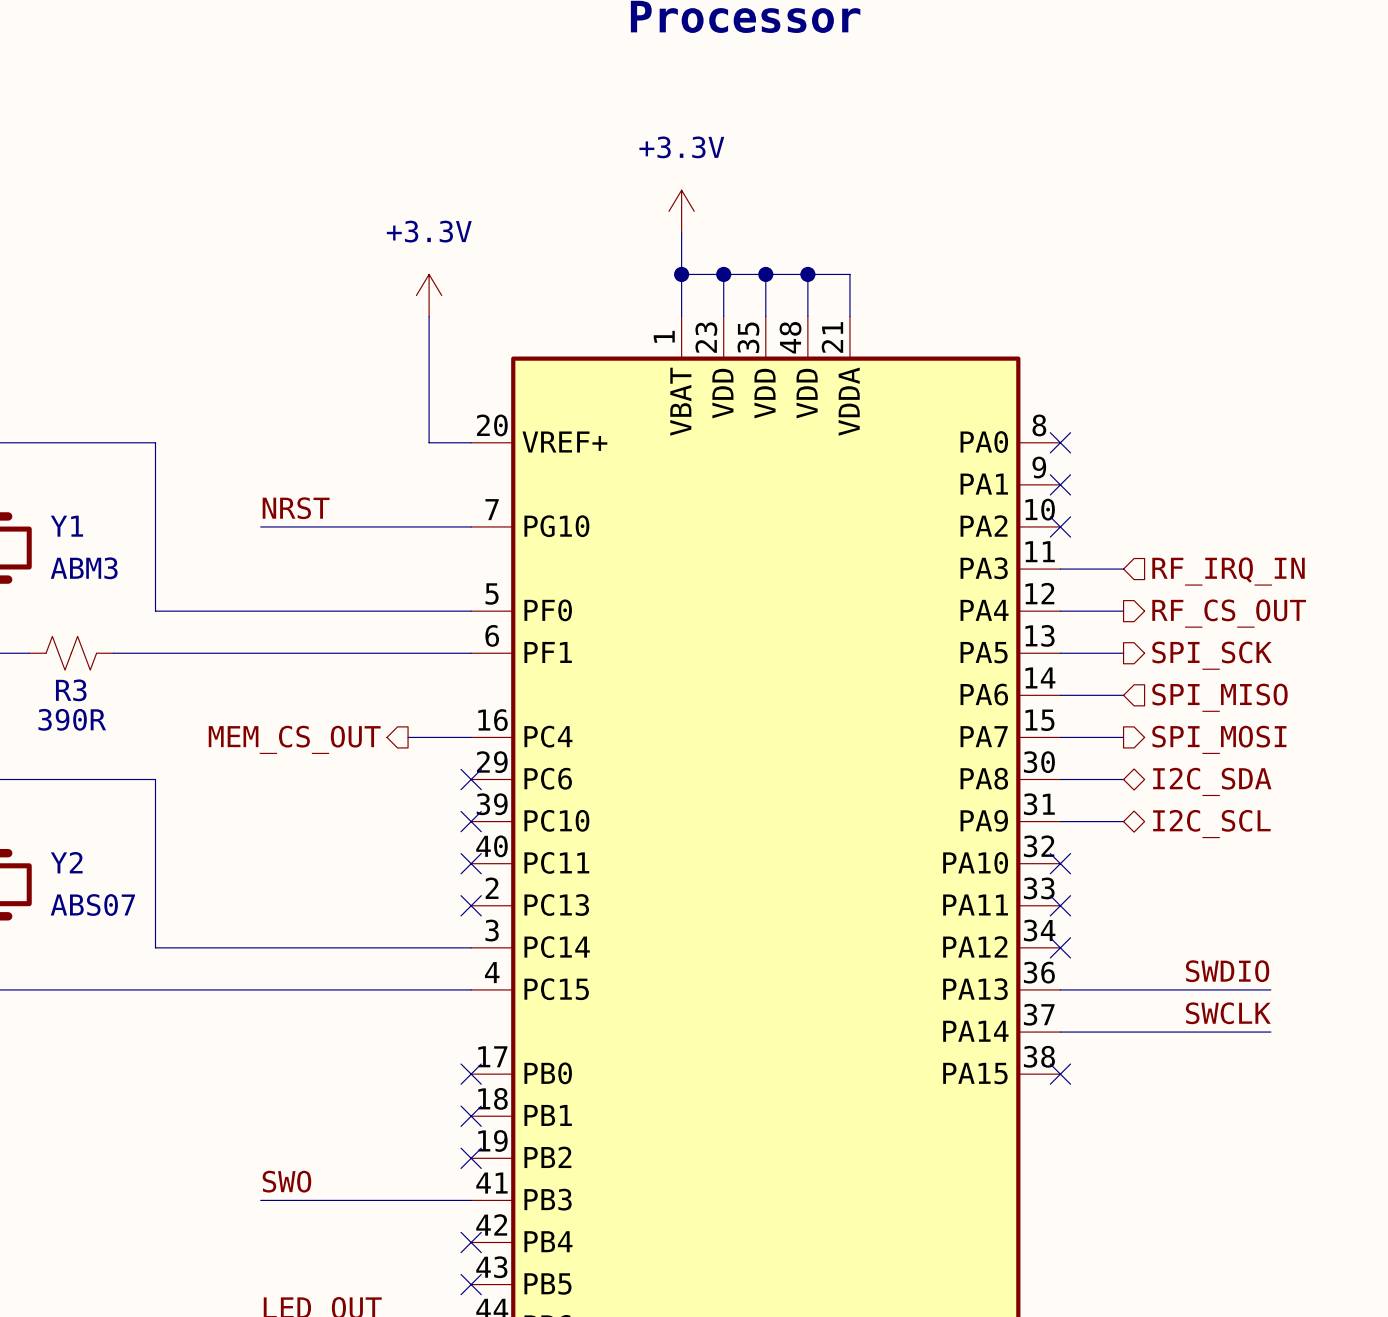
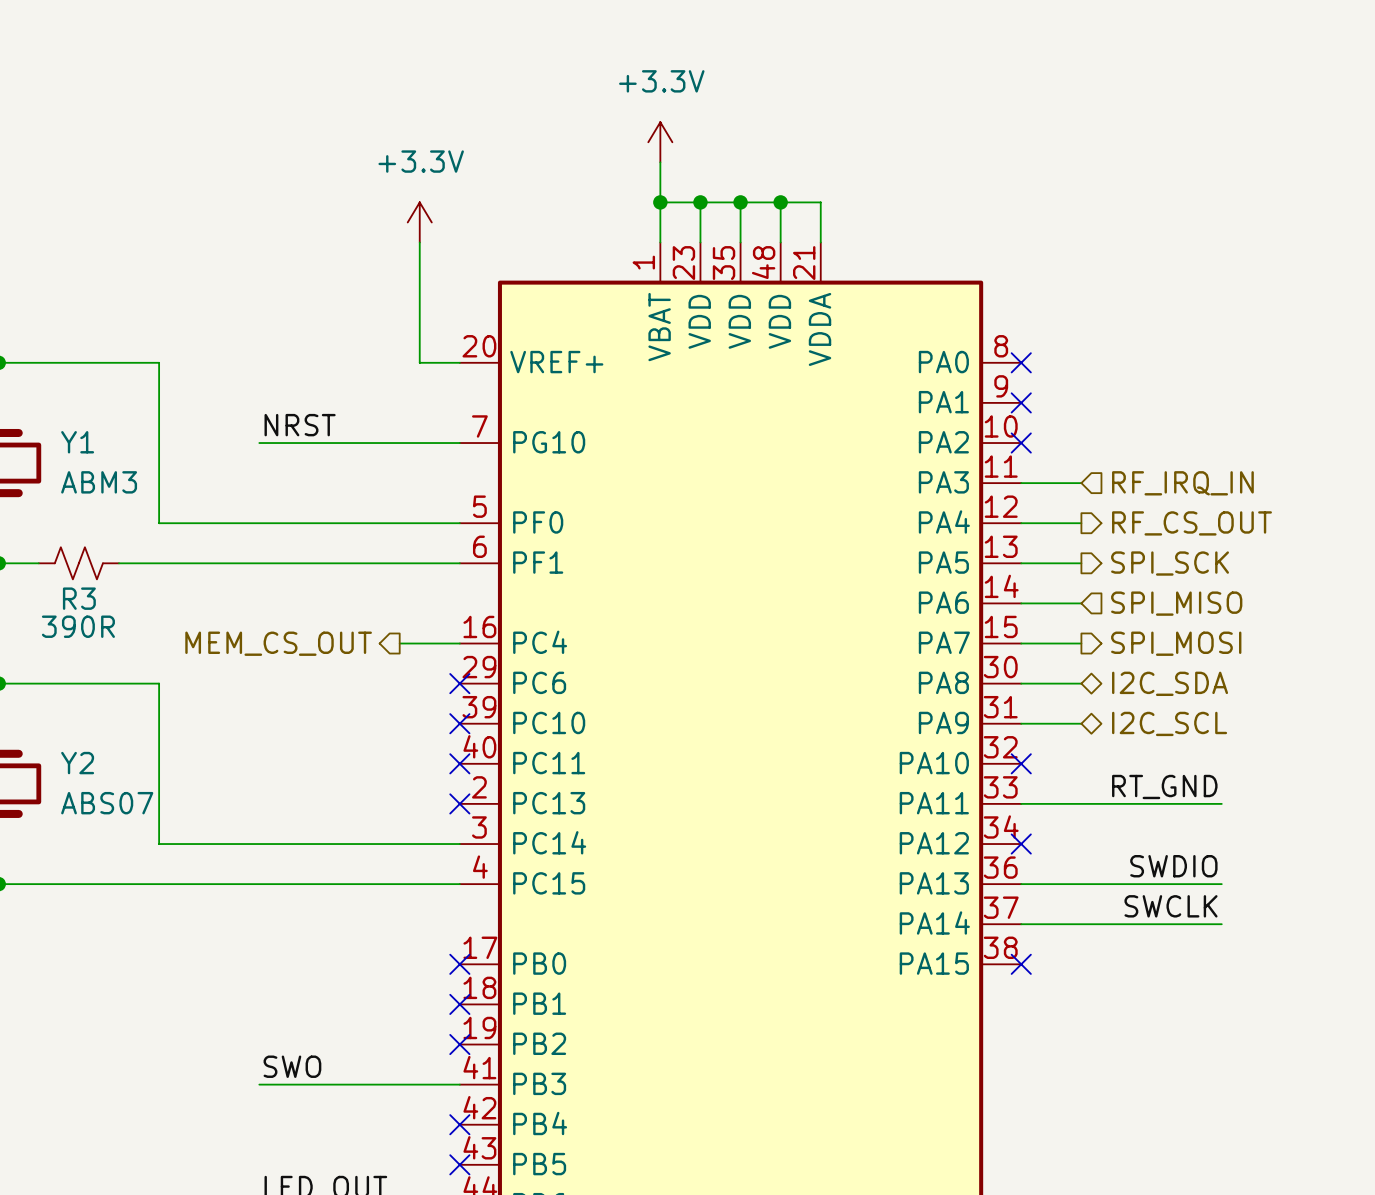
label: none -> RT_GND (1164, 786)
wire: none -> (1021, 803) (1221, 803)
no-connect mark: (1060, 905) -> none

